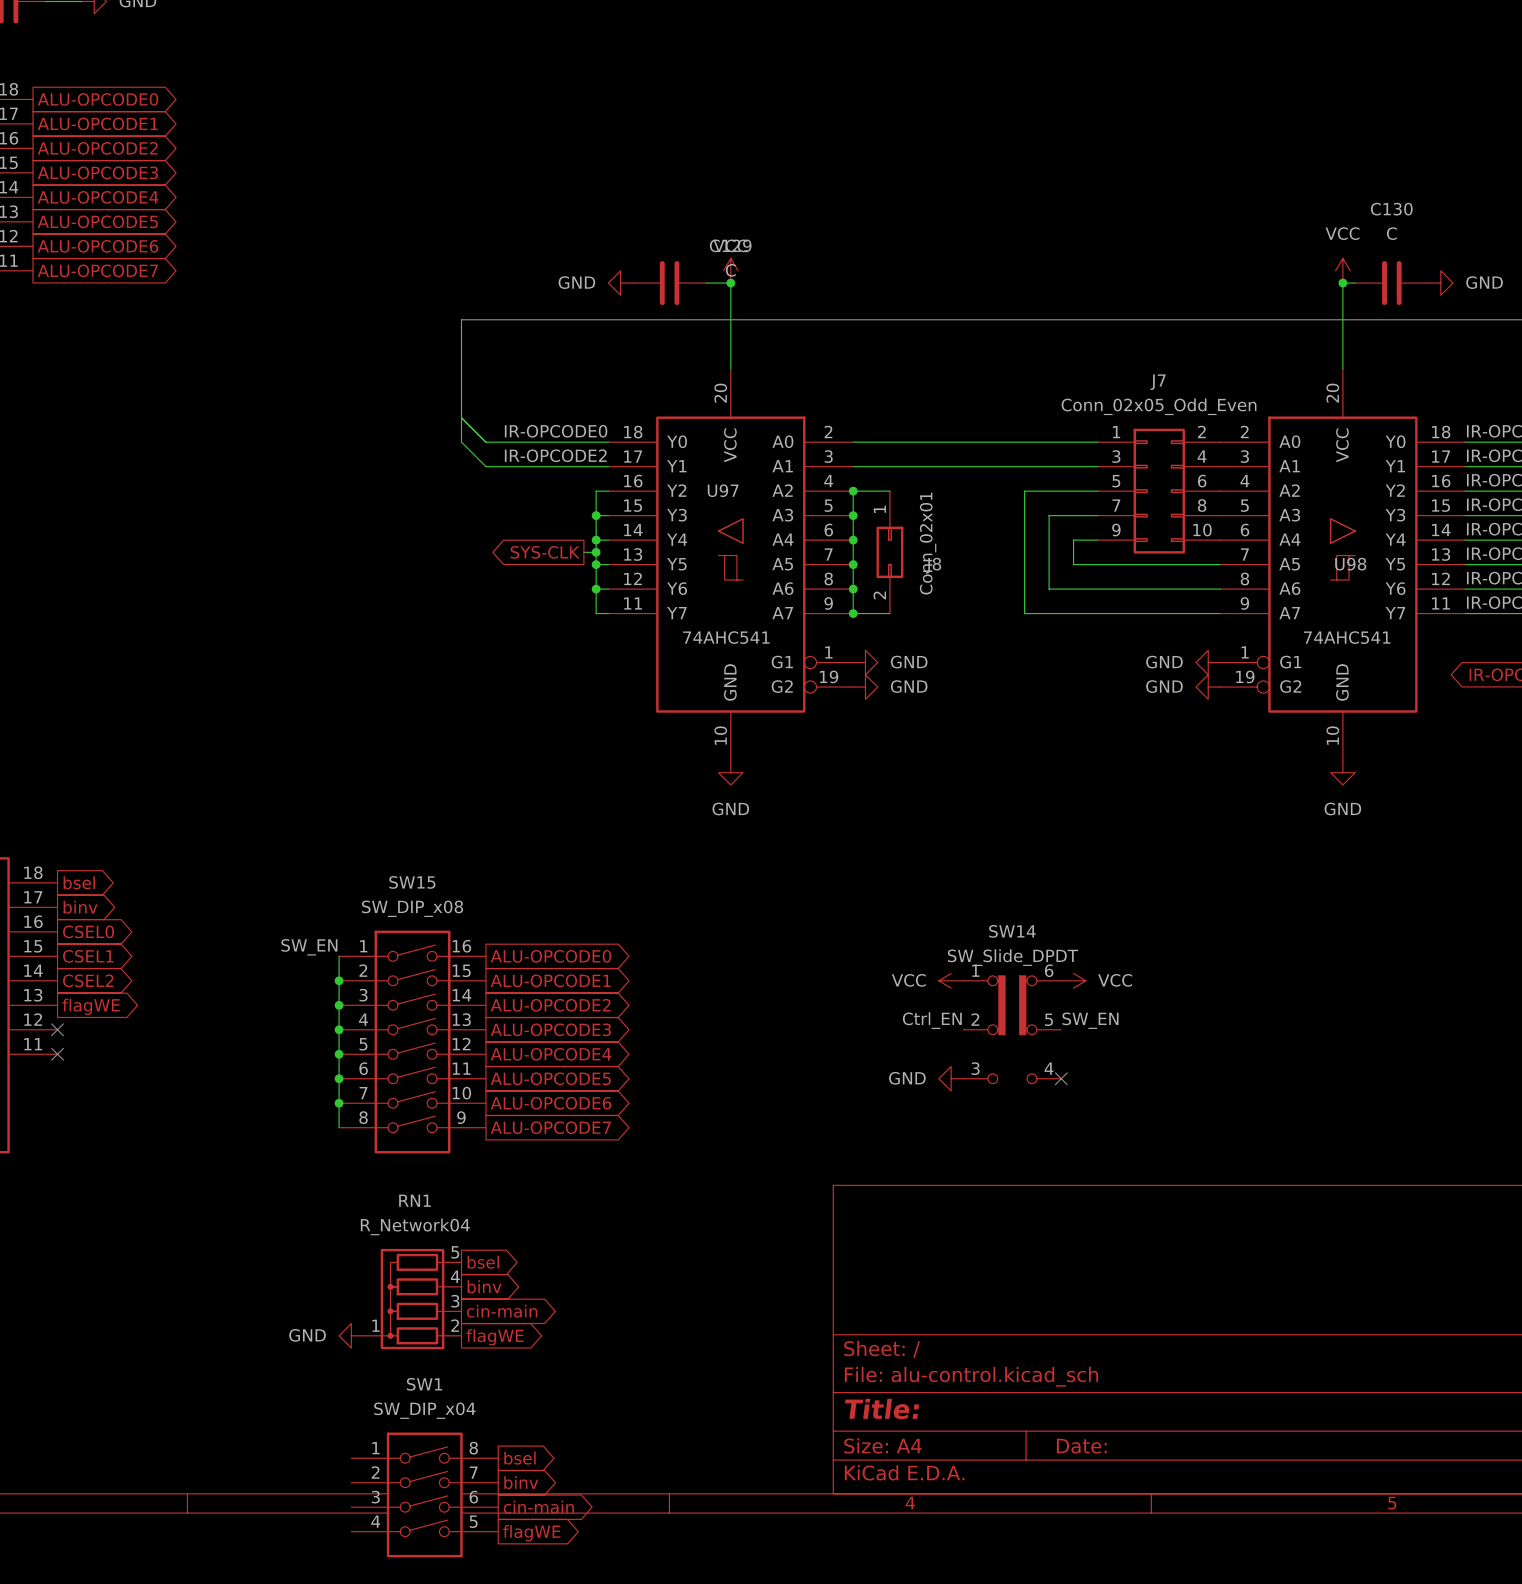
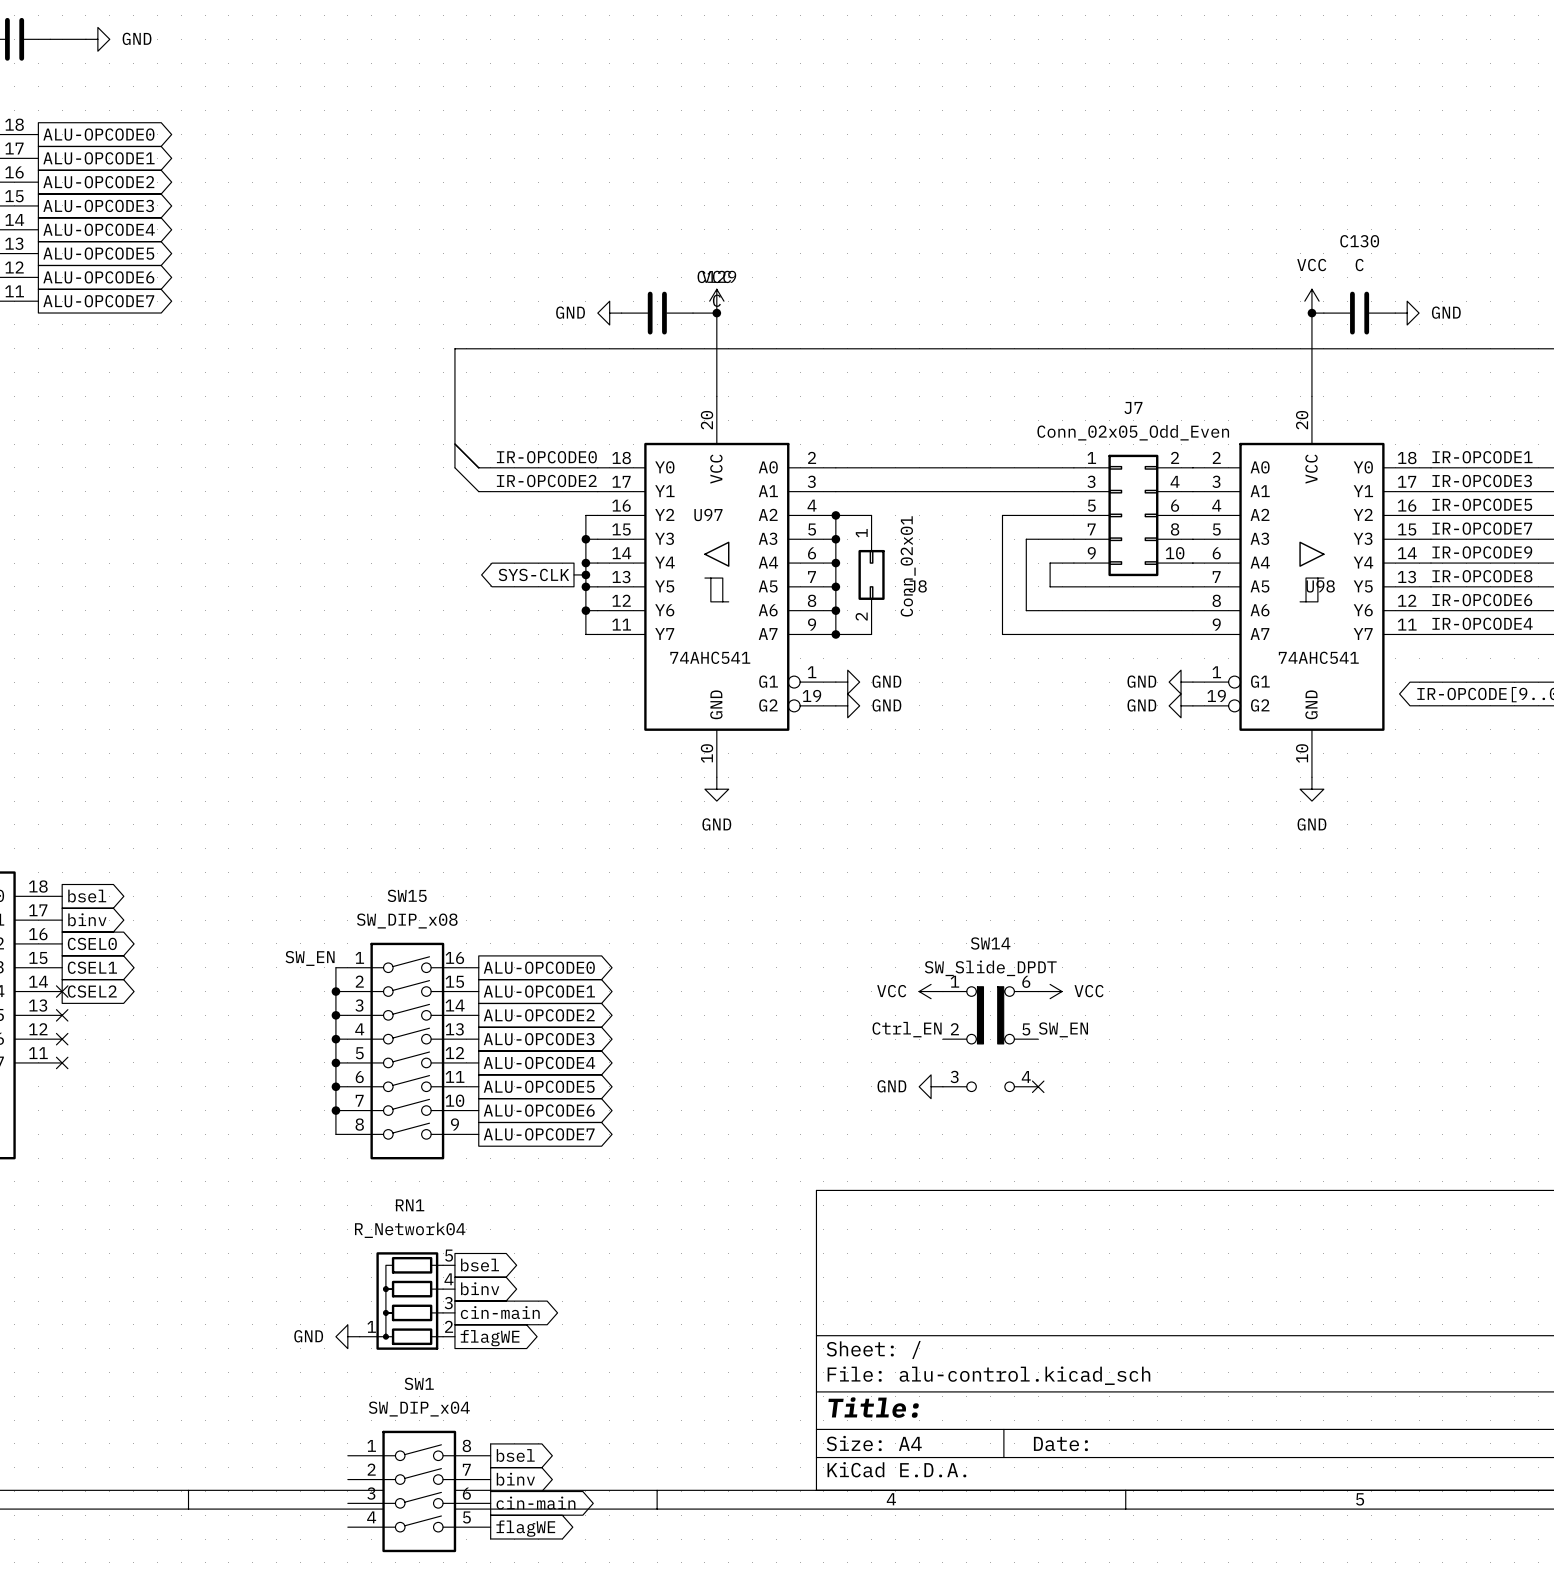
no-connect mark: none -> (62, 991)
no-connect mark: none -> (62, 1015)
global label: flagWE (91, 1006) -> none

